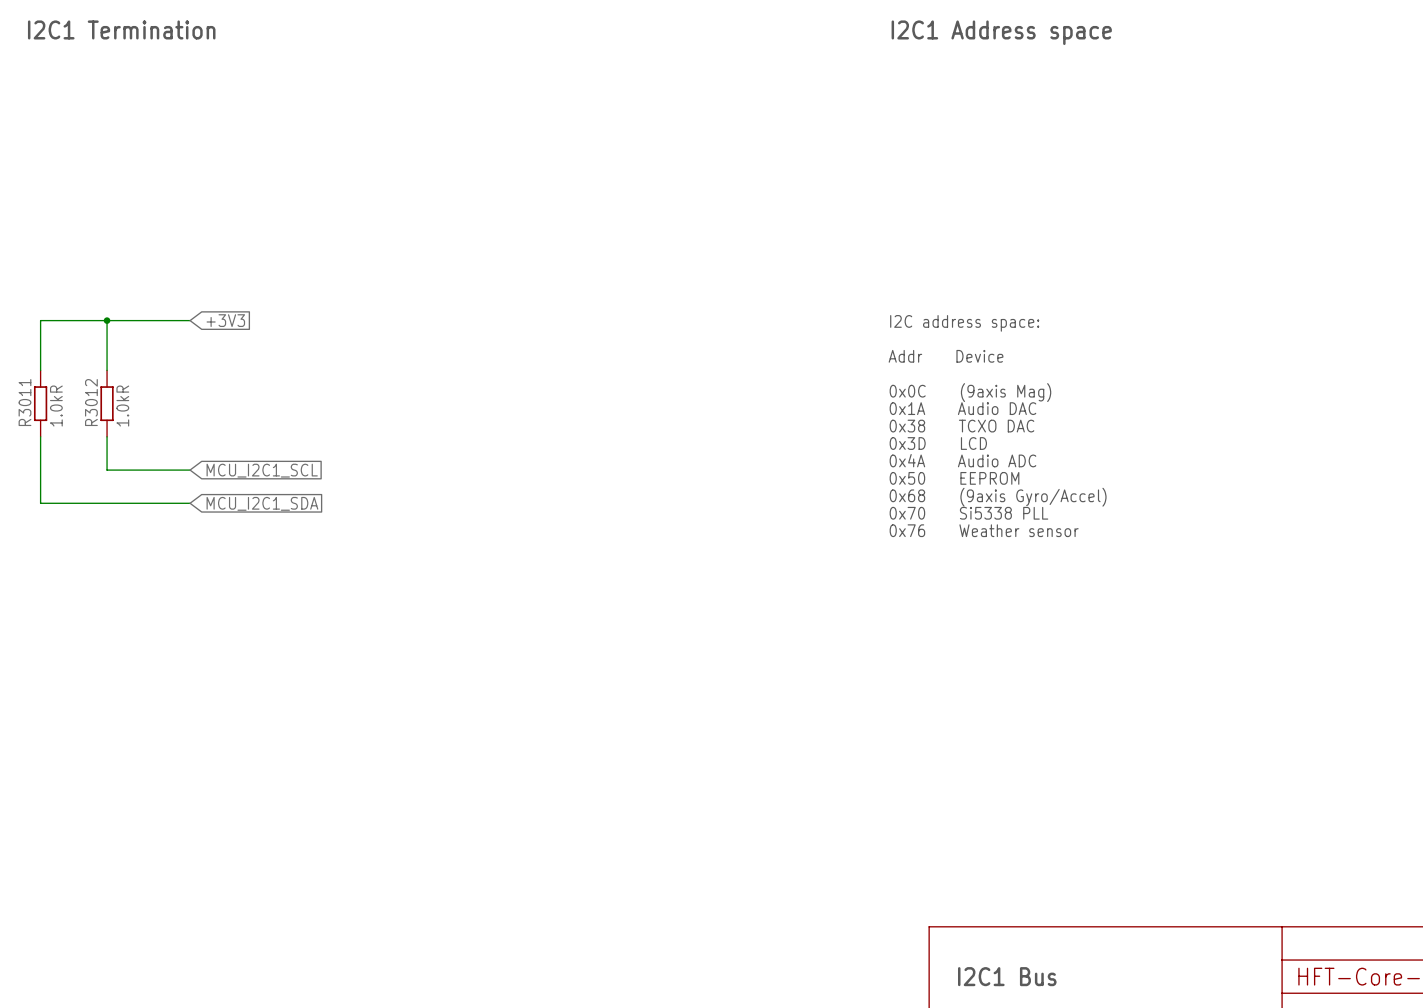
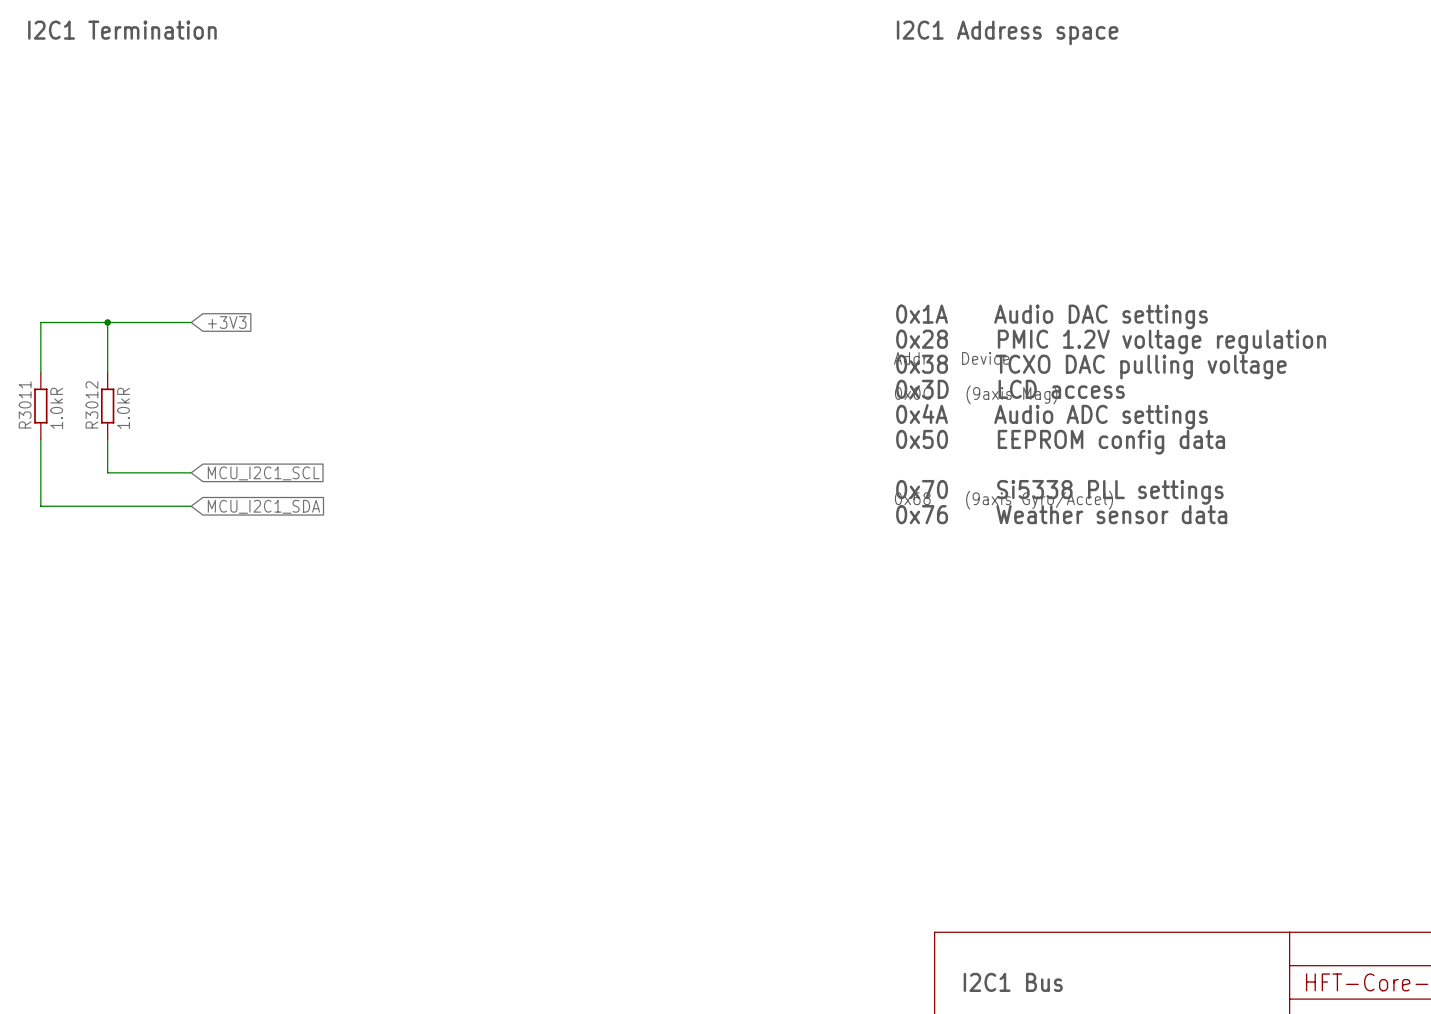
text: I2C address space: (964, 323) -> 0x1A Audio DAC settings (1052, 316)
text: none -> 0x28 PMIC 1.2V voltage regulation (1111, 341)
text: none -> 0x38 TCXO DAC pulling voltage (1091, 367)
text: none -> 0x3D LCD access (1010, 389)
text: 0x1A Audio DAC (962, 408) -> 0x4A Audio ADC settings (1052, 416)
text: 0x38 TCXO DAC (961, 426) -> none
text: 0x3D LCD (938, 443) -> 0x50 EEPROM config data (1060, 442)
text: 0x4A Audio ADC (962, 460) -> none
text: 0x50 EEPROM (954, 478) -> none
text: none -> 0x70 Si5338 PLL settings (1059, 492)
text: 0x70 Si5338 PLL (968, 513) -> 0x76 Weather sensor data (1061, 514)
text: 0x76 Weather sensor (984, 530) -> none

